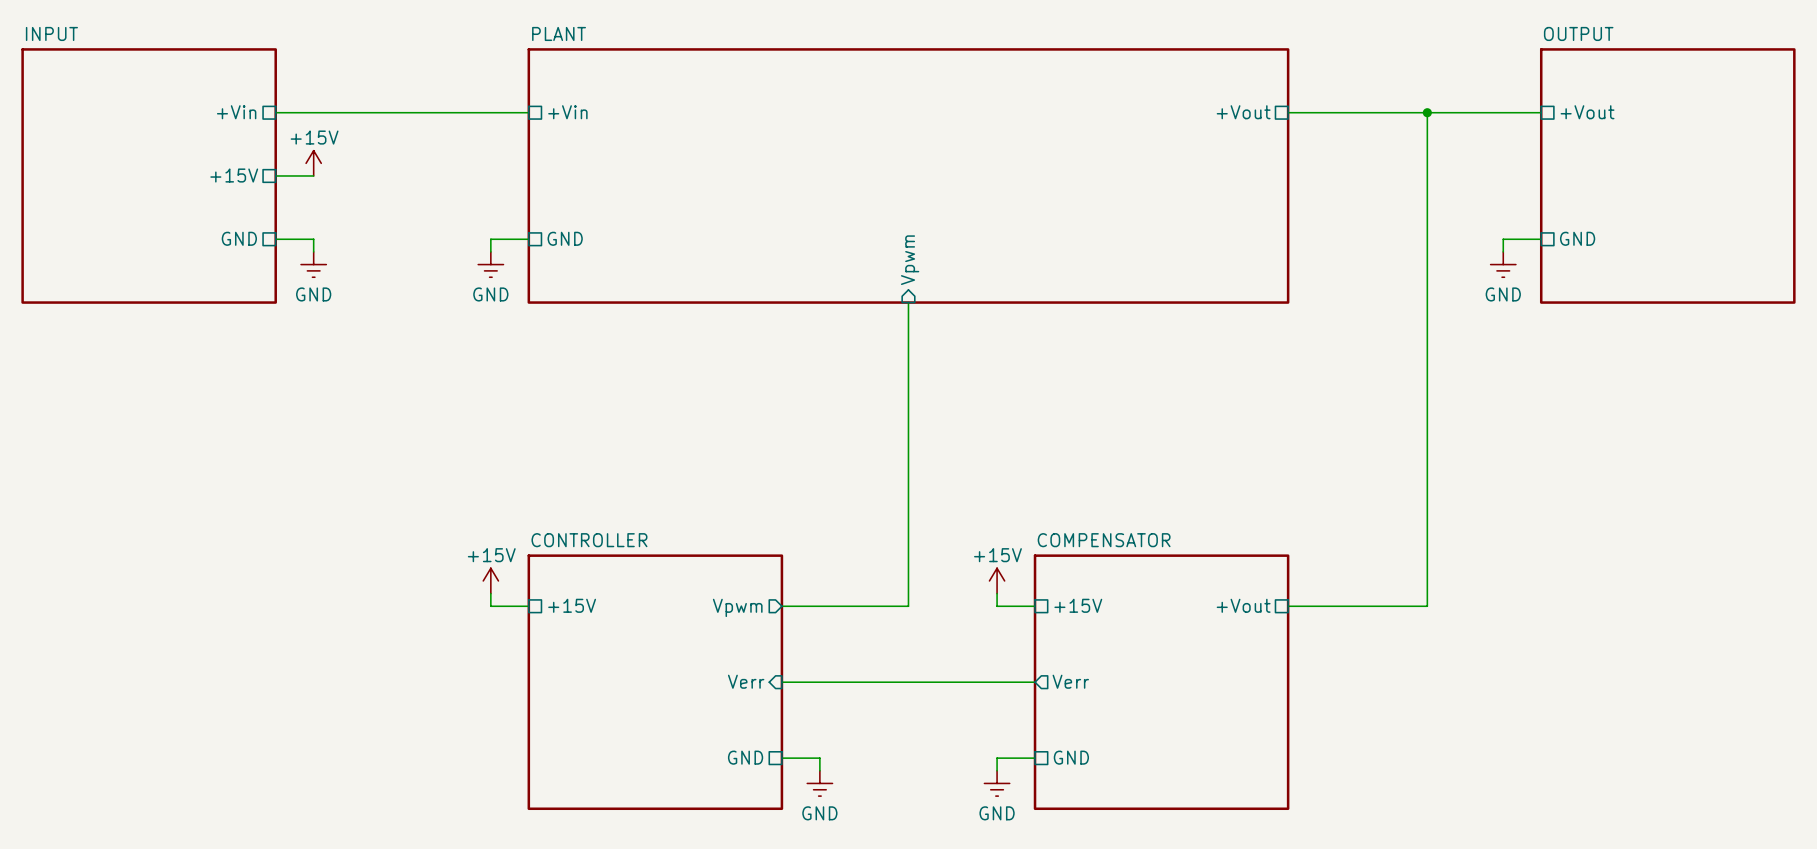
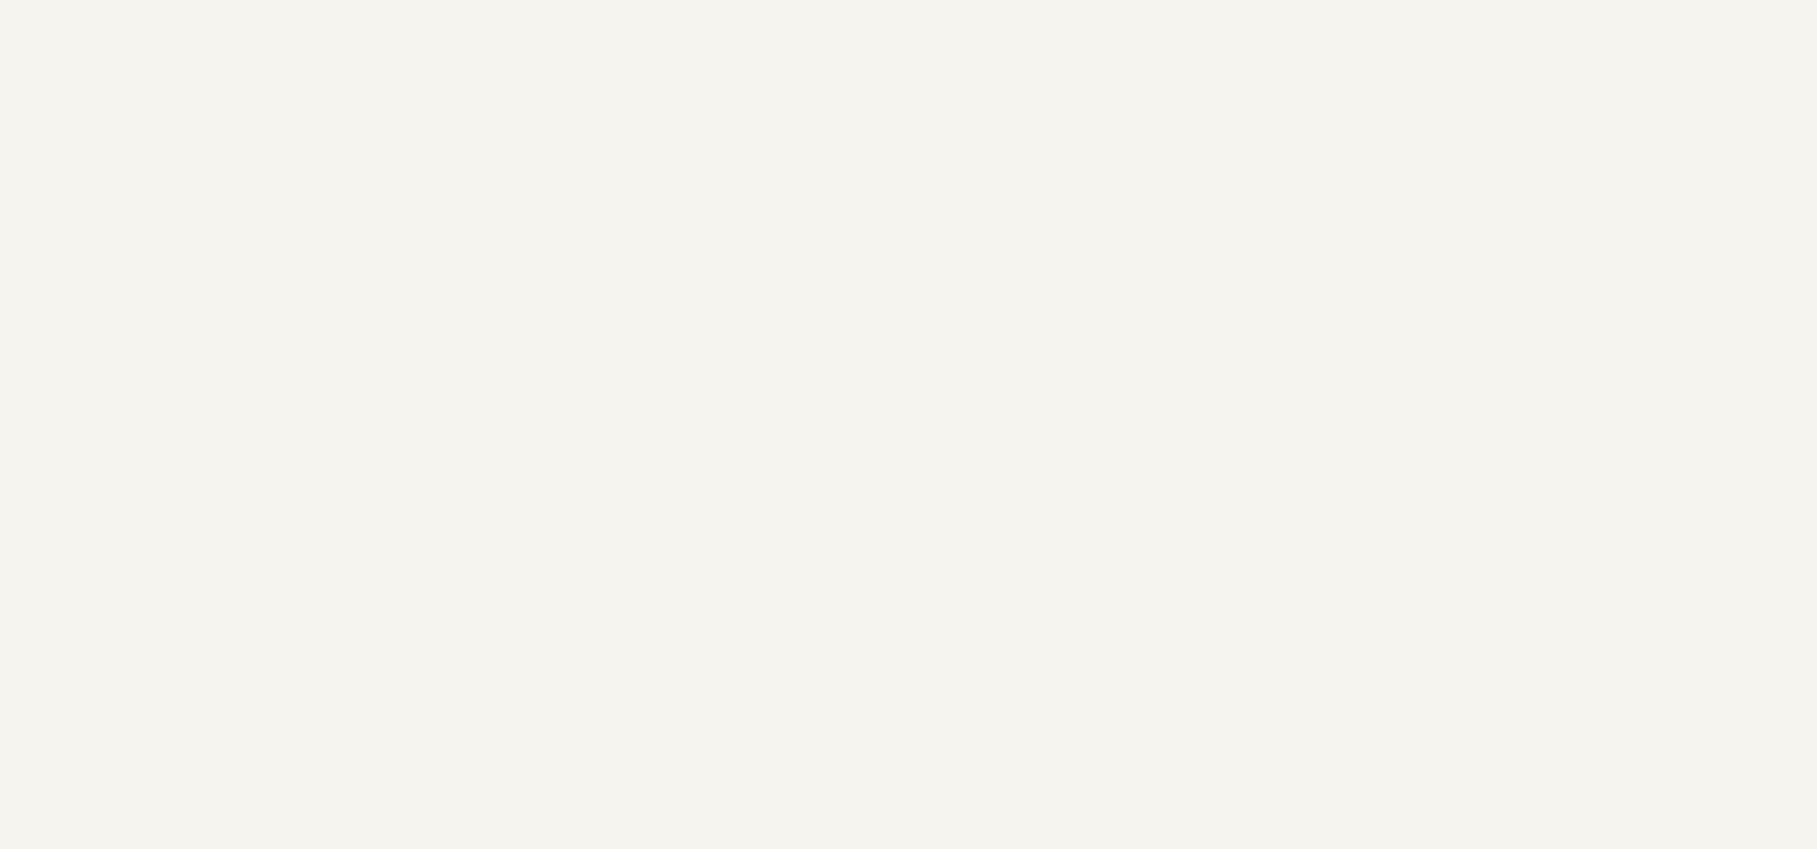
sheet pin: +Vin (236, 112) -> none
wire: (275, 112) (528, 112) -> none
sheet pin: +Vin (567, 112) -> none
sheet pin: +Vout (1243, 112) -> none
wire: (1288, 112) (1541, 112) -> none
wire: (1427, 112) (1427, 606) (1288, 606) -> none
junction: (1427, 112) -> none
sheet pin: +Vout (1587, 112) -> none
power symbol: +15V (313, 163) -> none
sheet INPUT: (149, 175) -> none
sheet pin: +15V (234, 175) -> none
wire: (275, 175) (313, 175) -> none
sheet PLANT: (908, 175) -> none
sheet OUTPUT: (1667, 175) -> none
sheet pin: GND (239, 238) -> none
sheet pin: GND (565, 238) -> none
sheet pin: GND (1577, 238) -> none
wire: (275, 239) (313, 239) (313, 251) -> none
wire: (528, 239) (490, 239) (490, 251) -> none
wire: (1541, 239) (1503, 239) (1503, 251) -> none
sheet pin: Vpwm (910, 260) -> none
power symbol: GND (313, 264) -> none
power symbol: GND (490, 264) -> none
power symbol: GND (1503, 264) -> none
wire: (908, 302) (908, 606) (781, 606) -> none
power symbol: +15V (490, 580) -> none
power symbol: +15V (997, 580) -> none
wire: (490, 593) (490, 606) (528, 606) -> none
wire: (997, 593) (997, 606) (1035, 606) -> none
sheet pin: +15V (572, 605) -> none
sheet pin: +15V (1078, 605) -> none
sheet pin: +Vout (1243, 605) -> none
sheet pin: Vpwm (737, 607) -> none
sheet pin: Verr (746, 681) -> none
sheet pin: Verr (1070, 681) -> none
sheet CONTROLLER: (655, 682) -> none
wire: (781, 682) (1035, 682) -> none
sheet COMPENSATOR: (1161, 682) -> none
sheet pin: GND (745, 757) -> none
sheet pin: GND (1071, 757) -> none
wire: (781, 758) (819, 758) (819, 770) -> none
wire: (1035, 758) (997, 758) (997, 770) -> none
power symbol: GND (819, 783) -> none
power symbol: GND (997, 783) -> none

